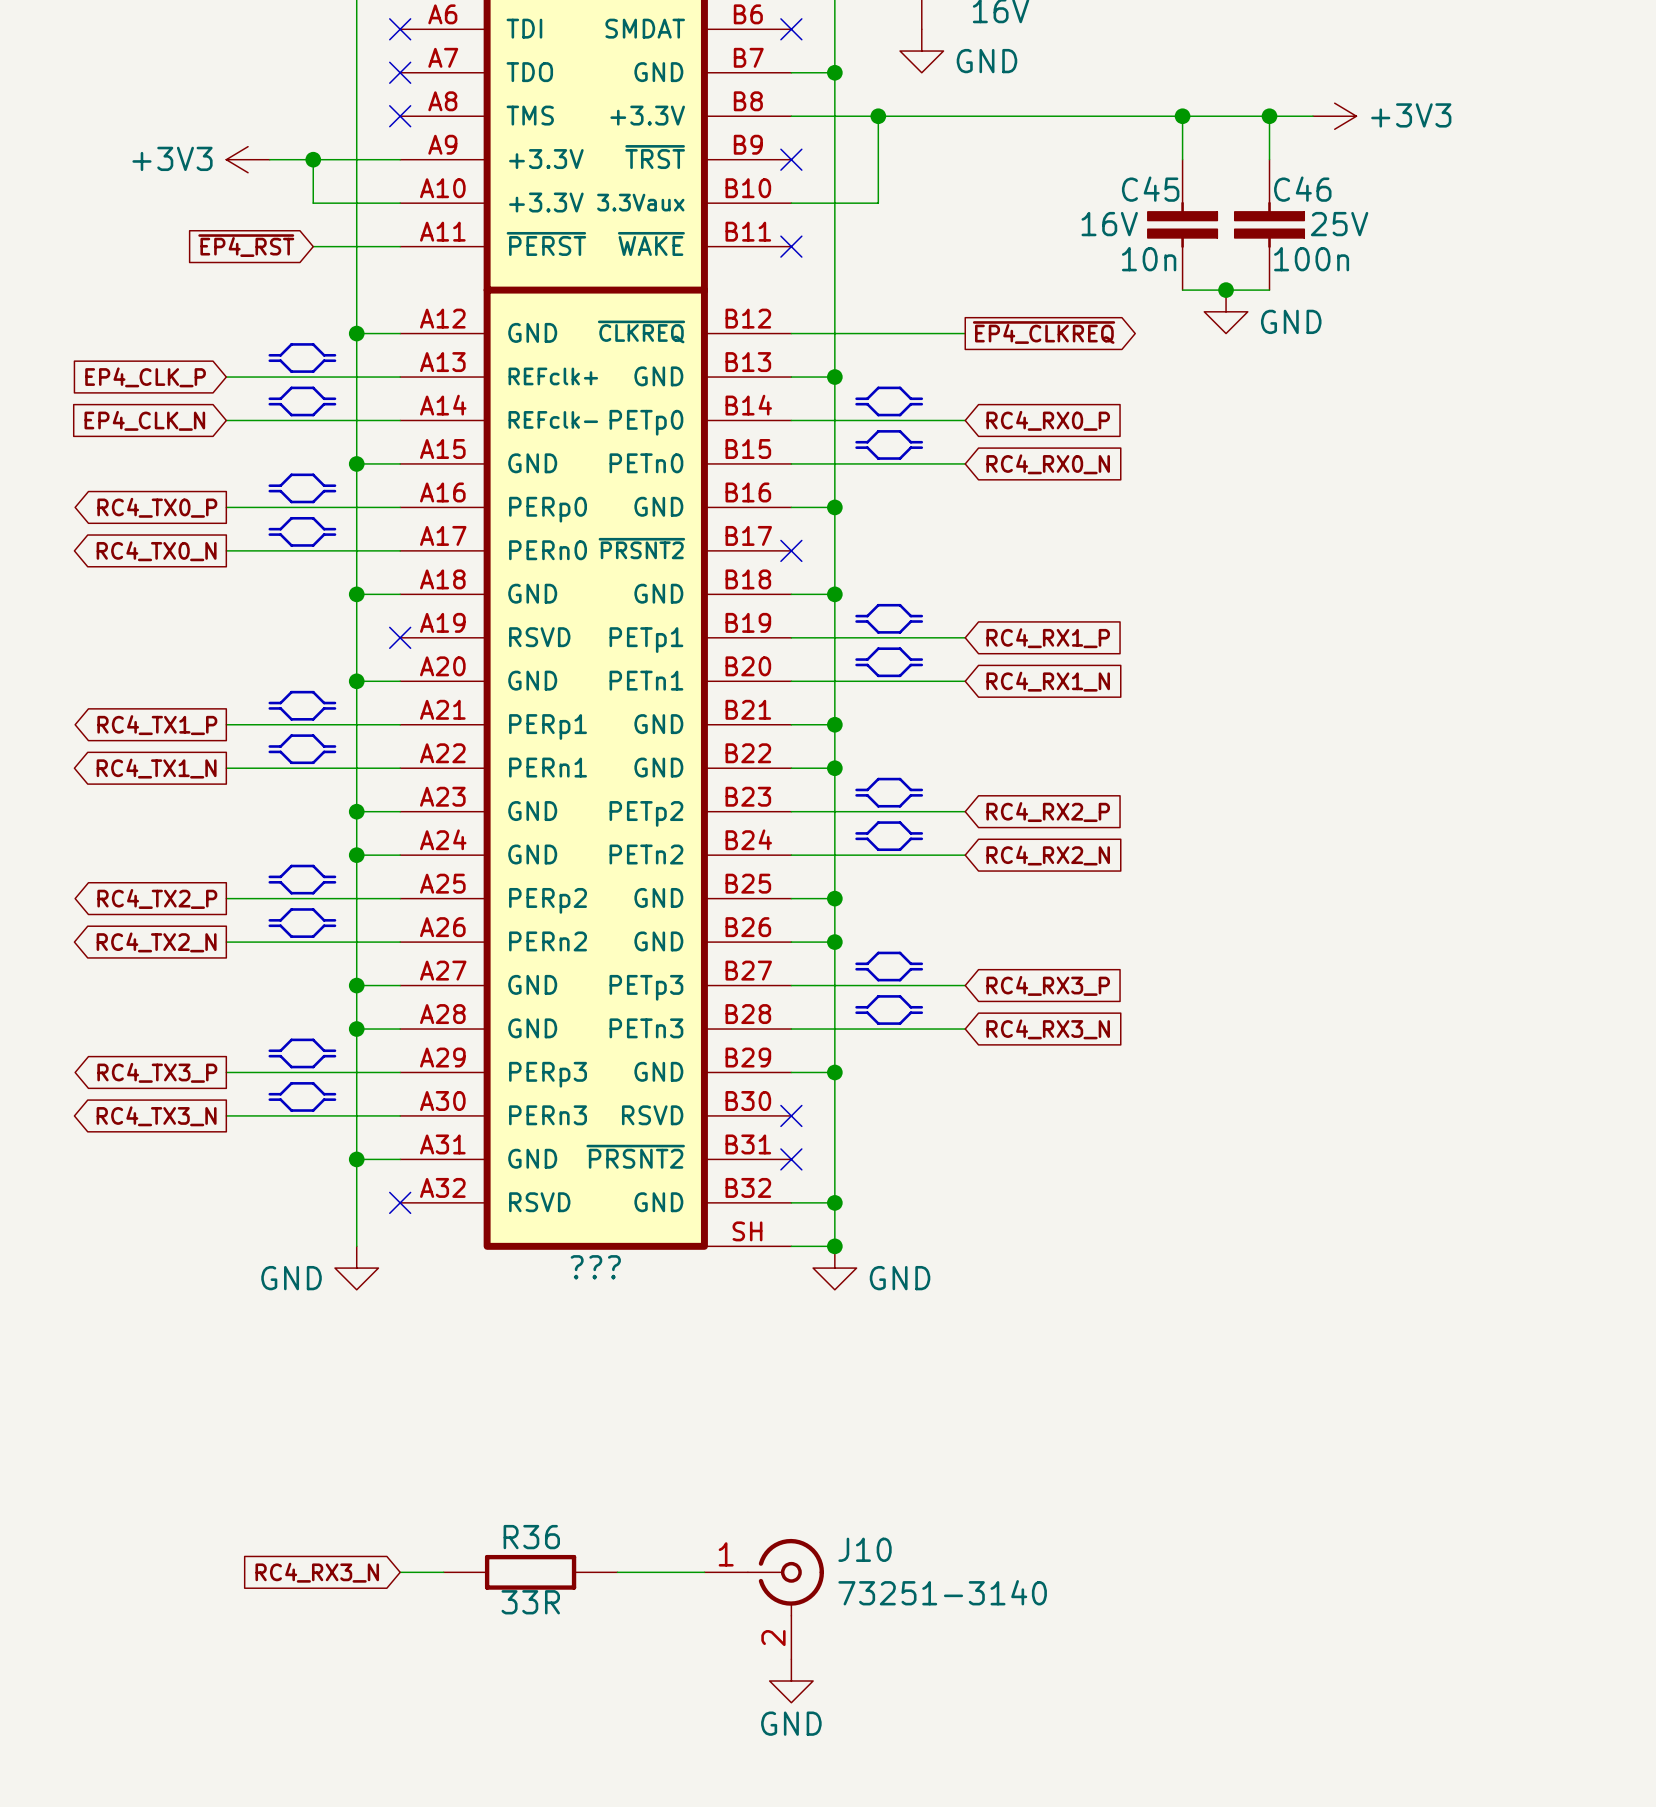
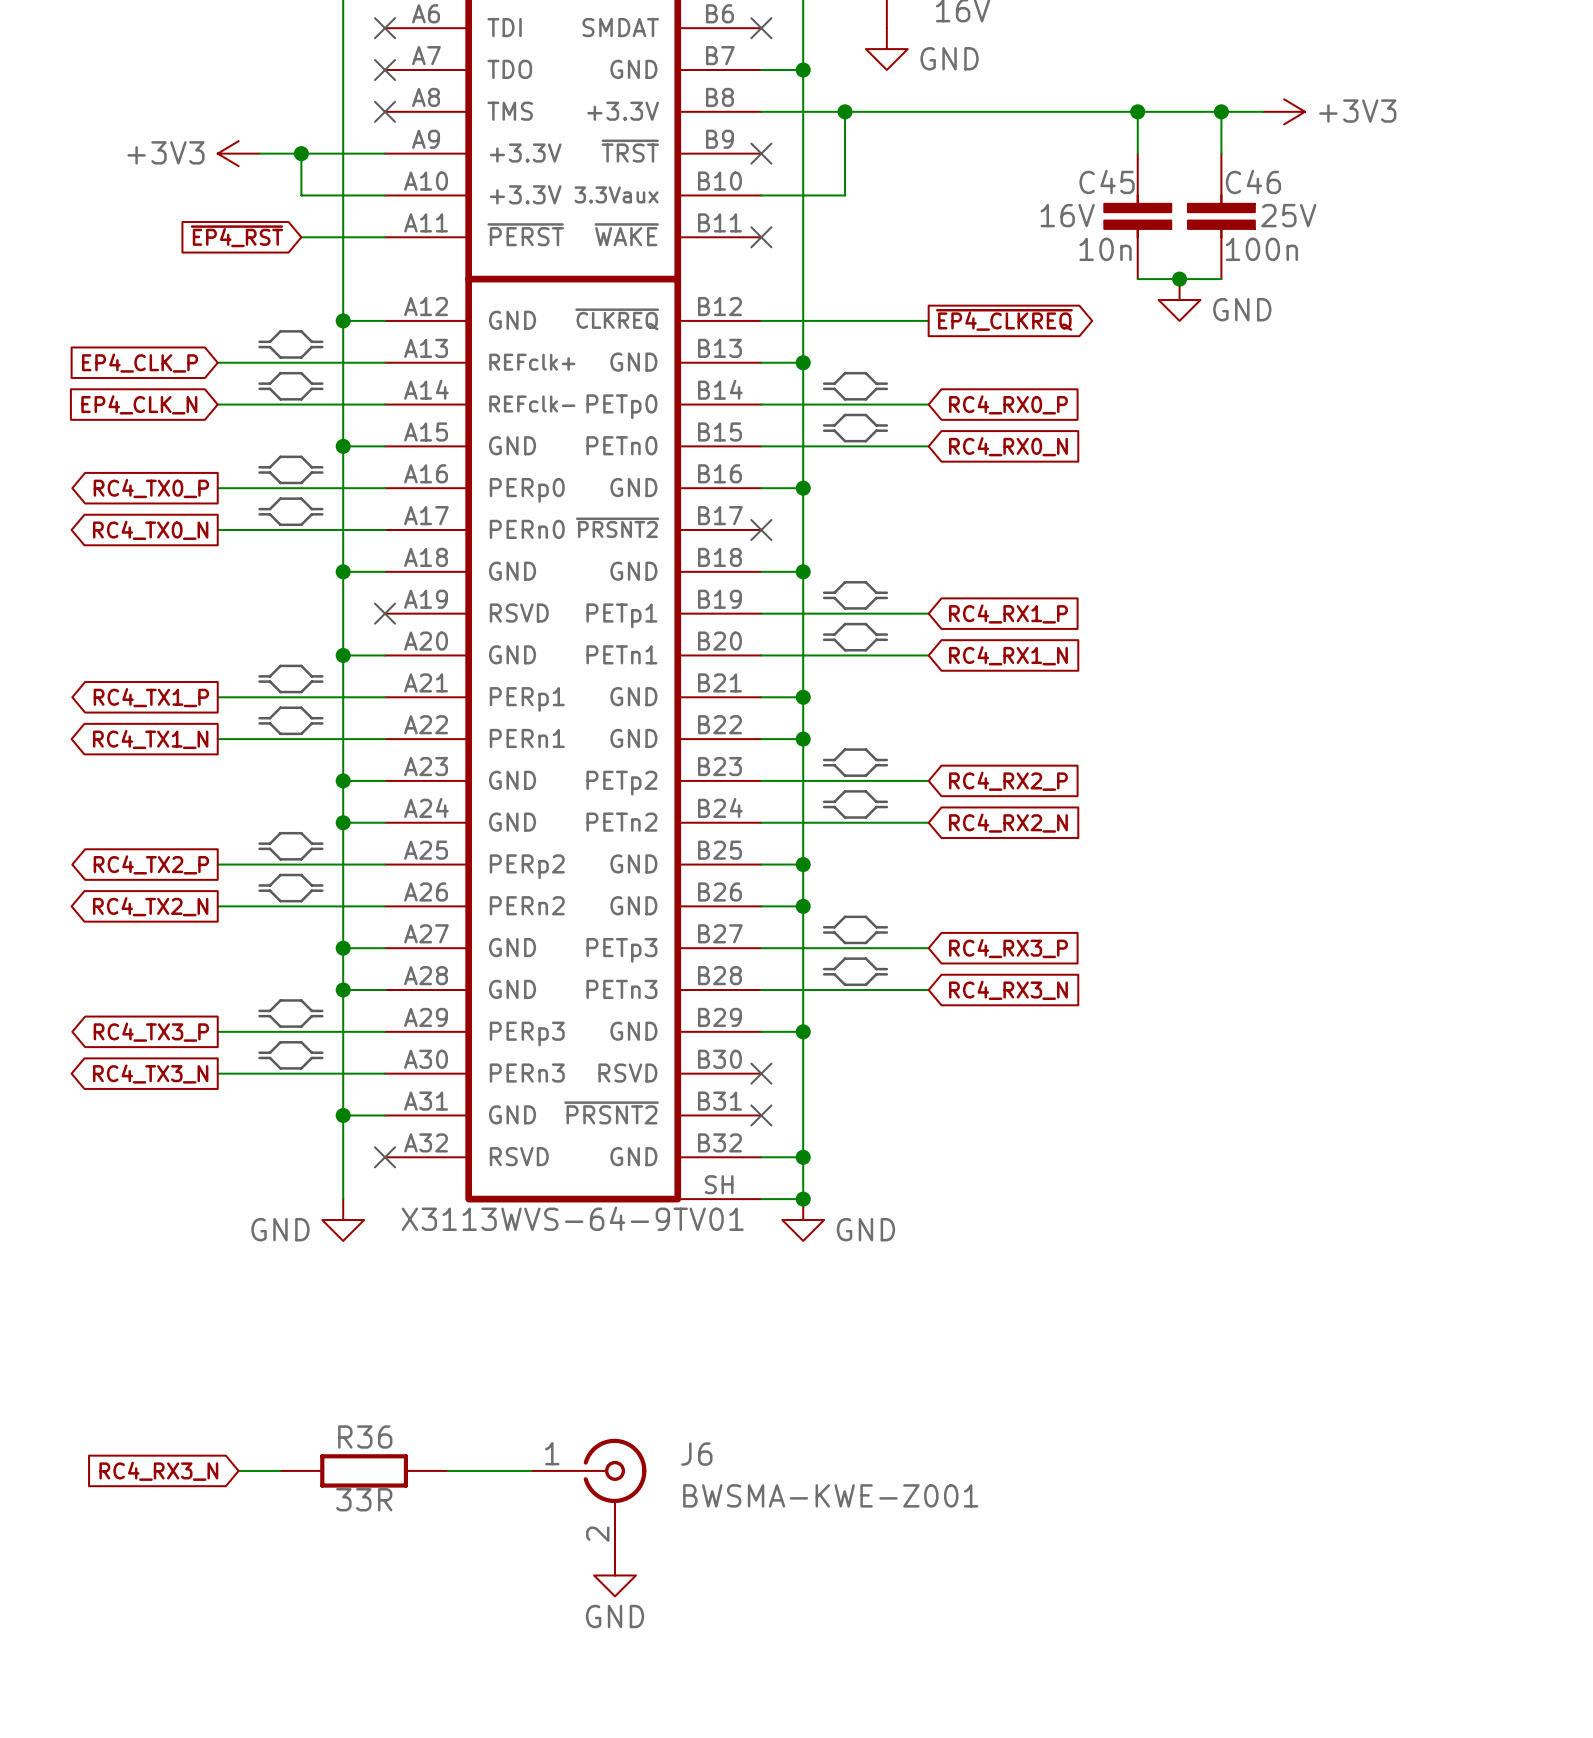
part value: ??? (595, 1267) -> X3113WVS-64-9TV01 (572, 1218)
J6: none -> BWSMA-KWE-Z001 (588, 1496)
global label position: RC4_RX3_N (317, 1572) -> RC4_RX3_N (158, 1471)
wire: (400, 1572) (443, 1572) -> (238, 1470) (280, 1470)
R36 position: (530, 1572) -> (364, 1470)
wire: (617, 1572) (704, 1572) -> (447, 1470) (531, 1470)
J10: 73251-3140 (764, 1599) -> none
power symbol position: GND (791, 1681) -> GND (615, 1575)

